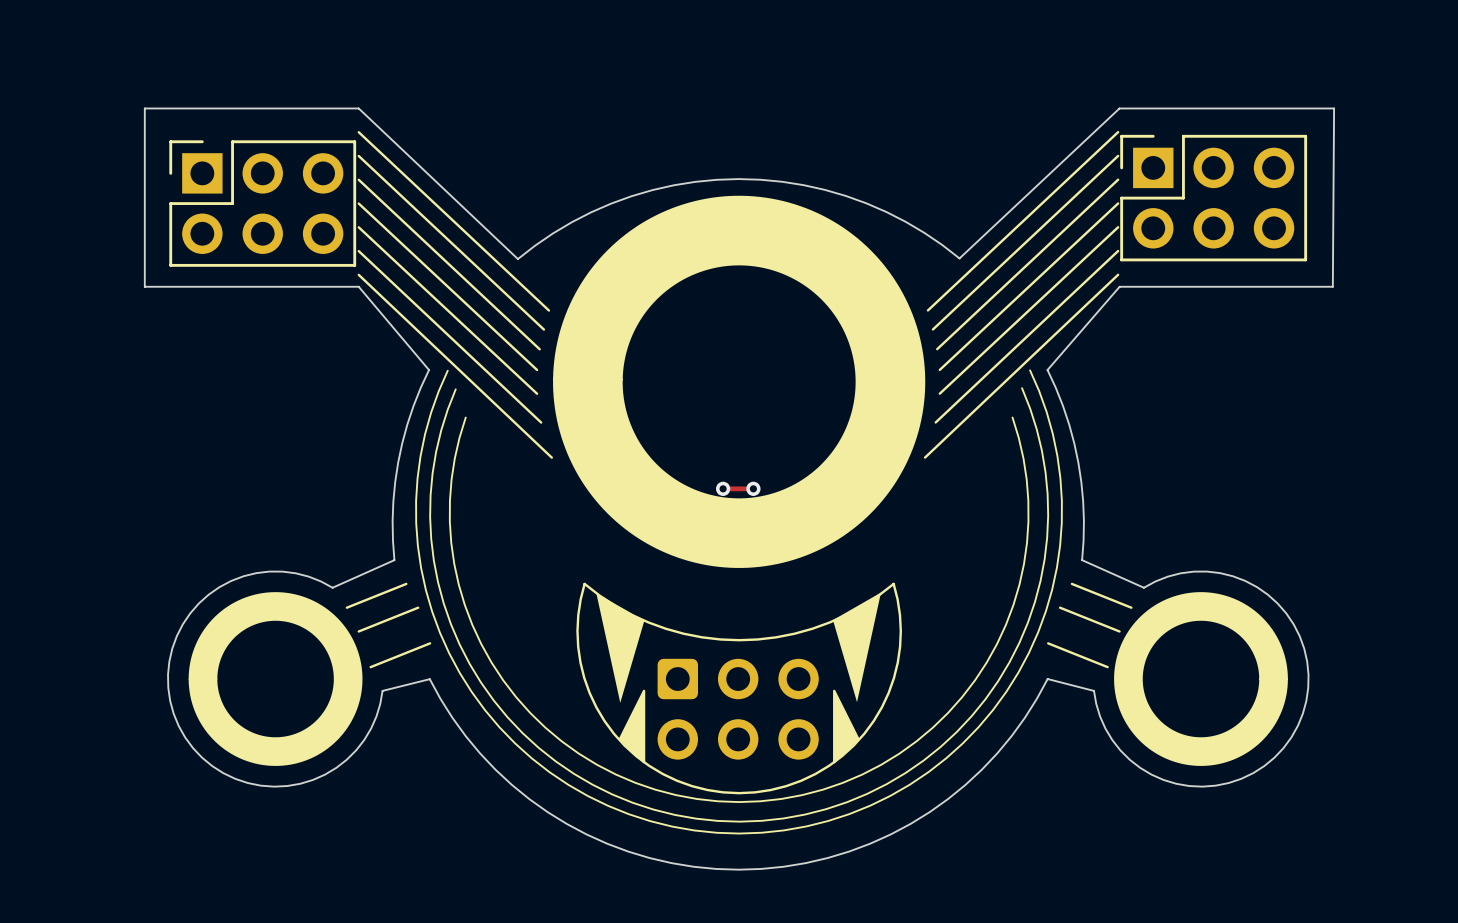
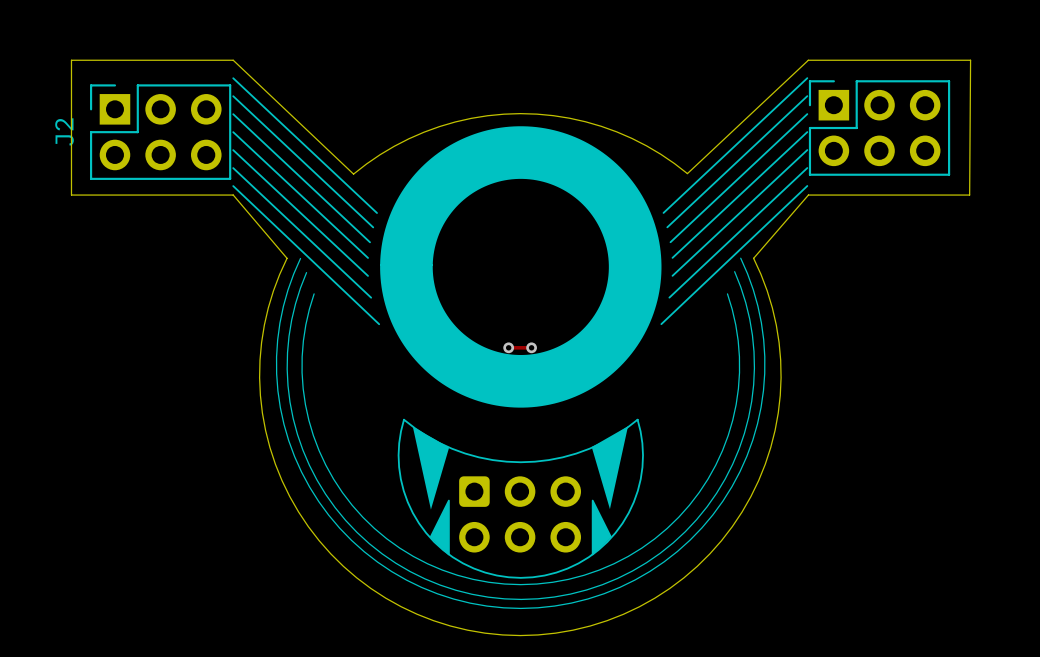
J2 name: none -> J2 (64, 132)
board edge: (358, 286) (429, 370) (407, 424) (398, 462) (392, 521) (394, 560) (332, 587) (308, 576) (295, 573) (269, 571) (256, 573) (231, 580) (208, 594) (198, 603) (182, 624) (176, 636) (169, 661) (168, 674) (170, 700) (173, 713) (185, 737) (202, 757) (223, 773) (235, 778) (247, 783) (274, 786) (300, 783) (325, 774) (346, 759) (356, 750) (371, 728) (376, 716) (382, 690) (429, 679) (465, 736) (495, 769) (529, 799) (566, 824) (607, 843) (649, 858) (693, 866) (738, 869) (805, 863) (849, 851) (910, 823) (948, 799) (997, 753) (1024, 717) (1047, 679) (1094, 690) (1100, 716) (1105, 728) (1120, 750) (1140, 767) (1151, 774) (1176, 783) (1189, 786) (1215, 785) (1241, 778) (1264, 766) (1283, 748) (1291, 737) (1302, 713) (1306, 700) (1308, 687) (1307, 661) (1304, 648) (1293, 624) (1277, 603) (1267, 594) (1245, 580) (1220, 573) (1206, 571) (1180, 573) (1155, 581) (1143, 587) (1082, 560) (1083, 501) (1078, 462) (1069, 424) (1047, 370) -> (233, 195) (287, 258) (268, 307) (261, 342) (259, 377) (262, 413) (269, 447) (282, 480) (298, 511) (319, 540) (343, 566) (385, 598) (433, 620) (485, 633) (520, 635) (555, 633) (590, 626) (623, 614) (654, 598) (683, 577) (709, 553) (732, 526) (750, 496) (765, 464) (775, 430) (780, 395) (780, 360) (776, 325) (767, 290) (753, 258)
line: (406, 583) (346, 607) -> none
line: (1071, 583) (1131, 607) -> none
drawing: [188, 592, 363, 766] -> none
drawing: [1114, 592, 1288, 766] -> none
line: (418, 607) (358, 631) -> none
line: (1060, 607) (1119, 631) -> none
line: (430, 643) (370, 667) -> none
line: (1048, 643) (1107, 667) -> none

